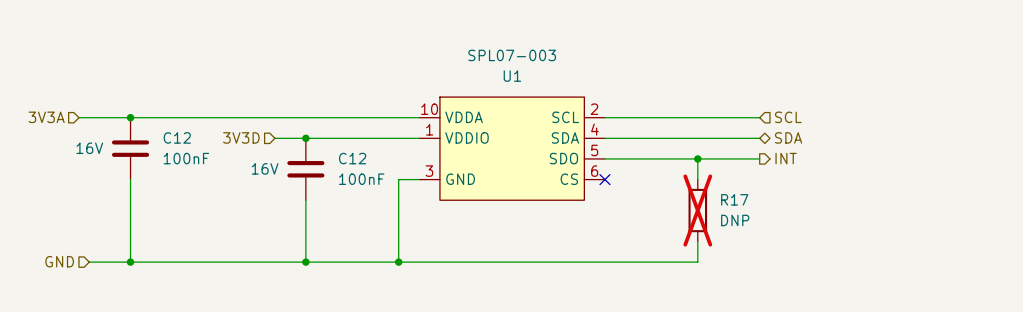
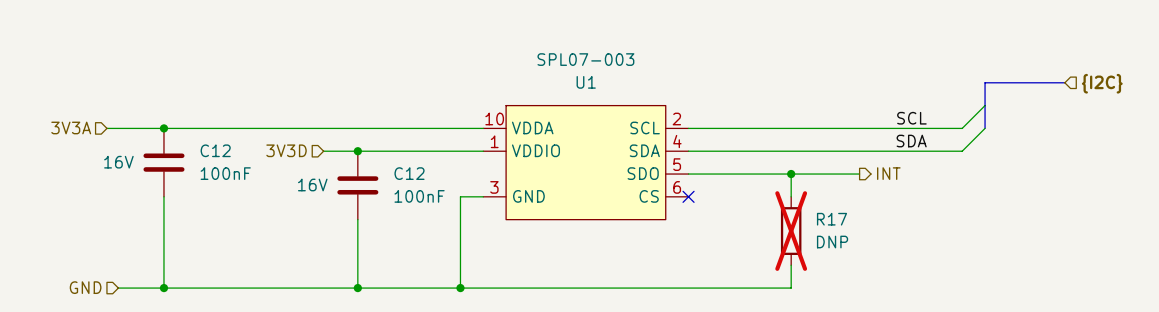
bus: none -> (1064, 82) (985, 82) (985, 128)
hierarchical label: none -> {I2C} (1102, 83)
wire: none -> (985, 105) (962, 128) (859, 128)
label: none -> SCL (911, 118)
hierarchical label: SCL (788, 117) -> none
wire: none -> (985, 128) (962, 151) (859, 151)
label: none -> SDA (911, 141)
hierarchical label: SDA (788, 137) -> none

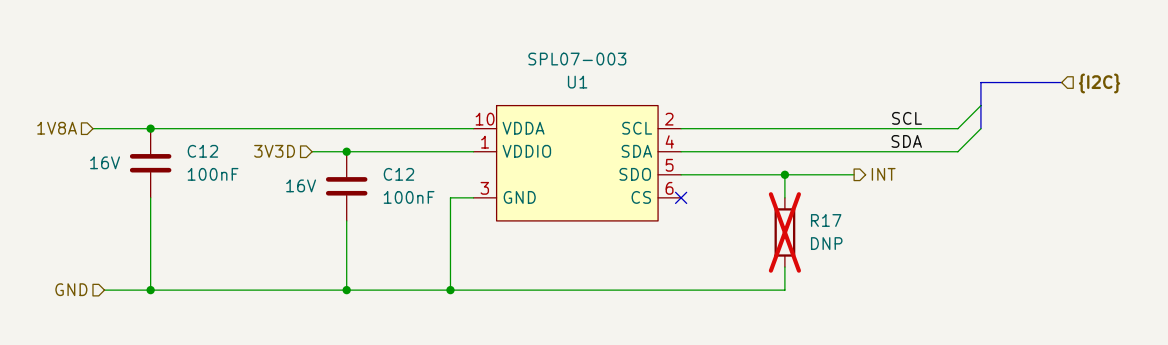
hierarchical label: 3V3A (71, 127) -> 1V8A (57, 128)

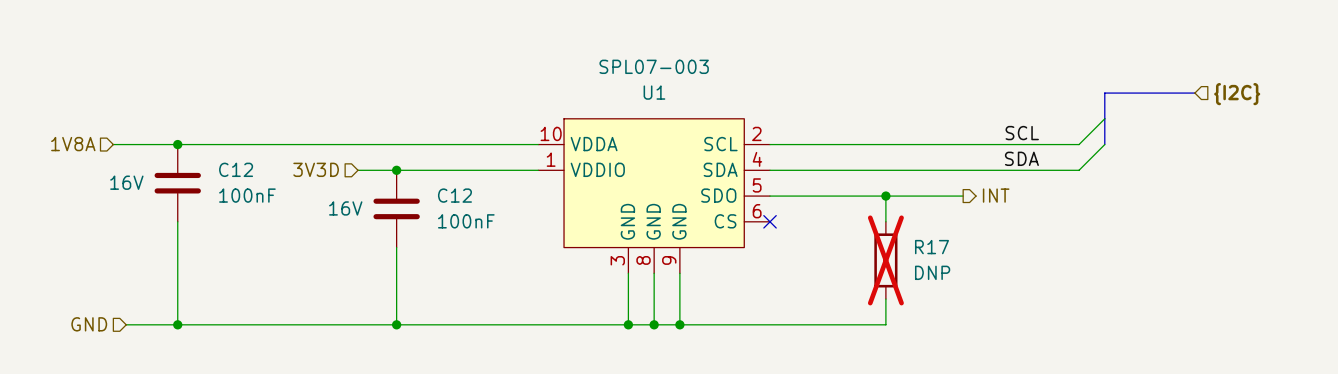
U1 symbol: [473, 105, 682, 221] -> [538, 118, 771, 274]
wire: (473, 197) (450, 197) (450, 290) -> none
wire: none -> (628, 273) (628, 324)
wire: none -> (654, 273) (654, 324)
wire: none -> (679, 273) (679, 324)
junction: (450, 290) -> none
junction: none -> (628, 324)
junction: none -> (654, 324)
junction: none -> (679, 324)

